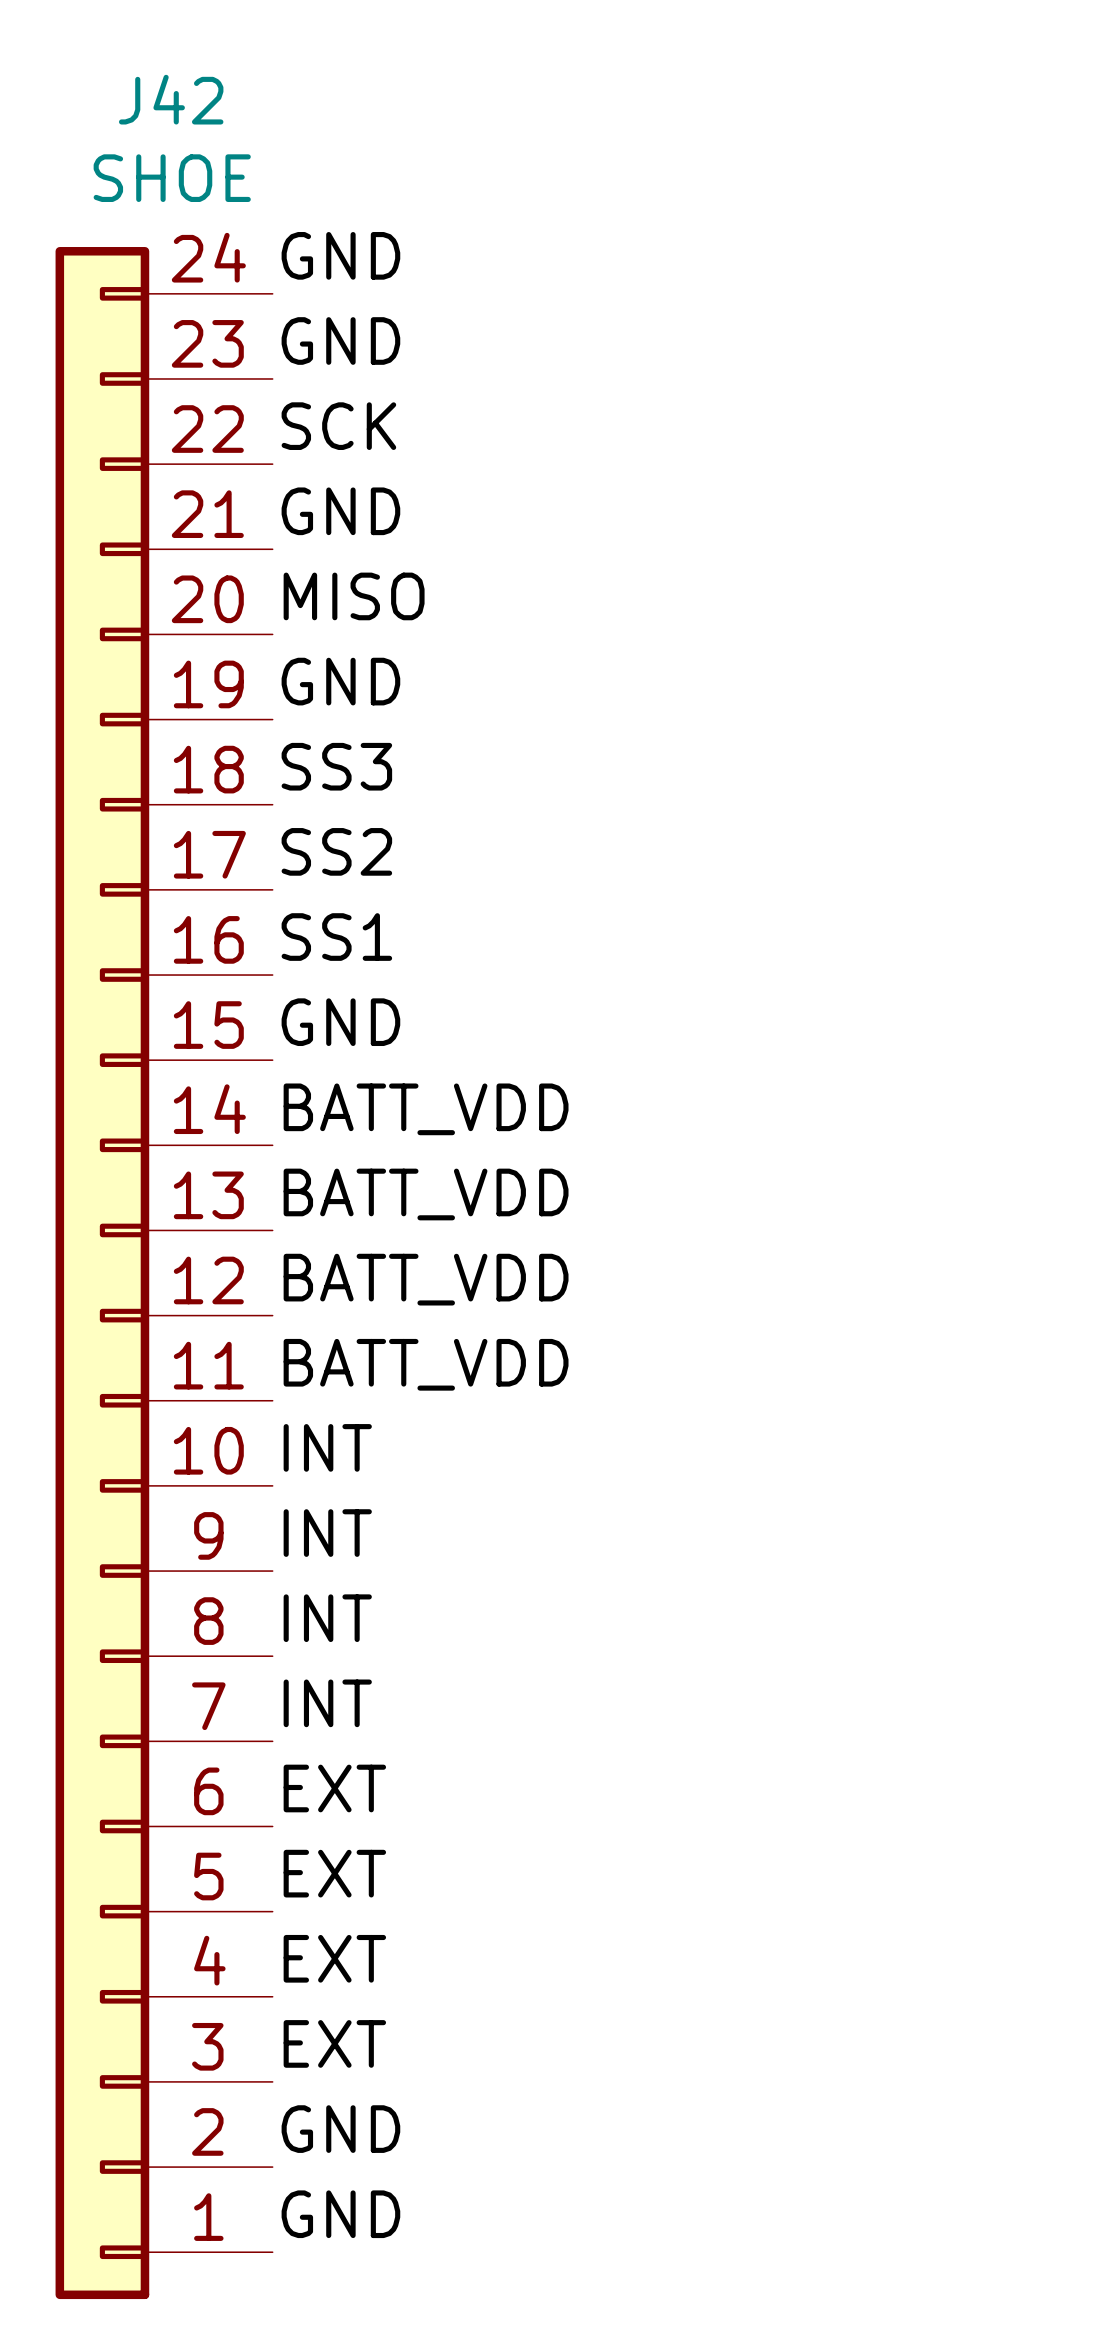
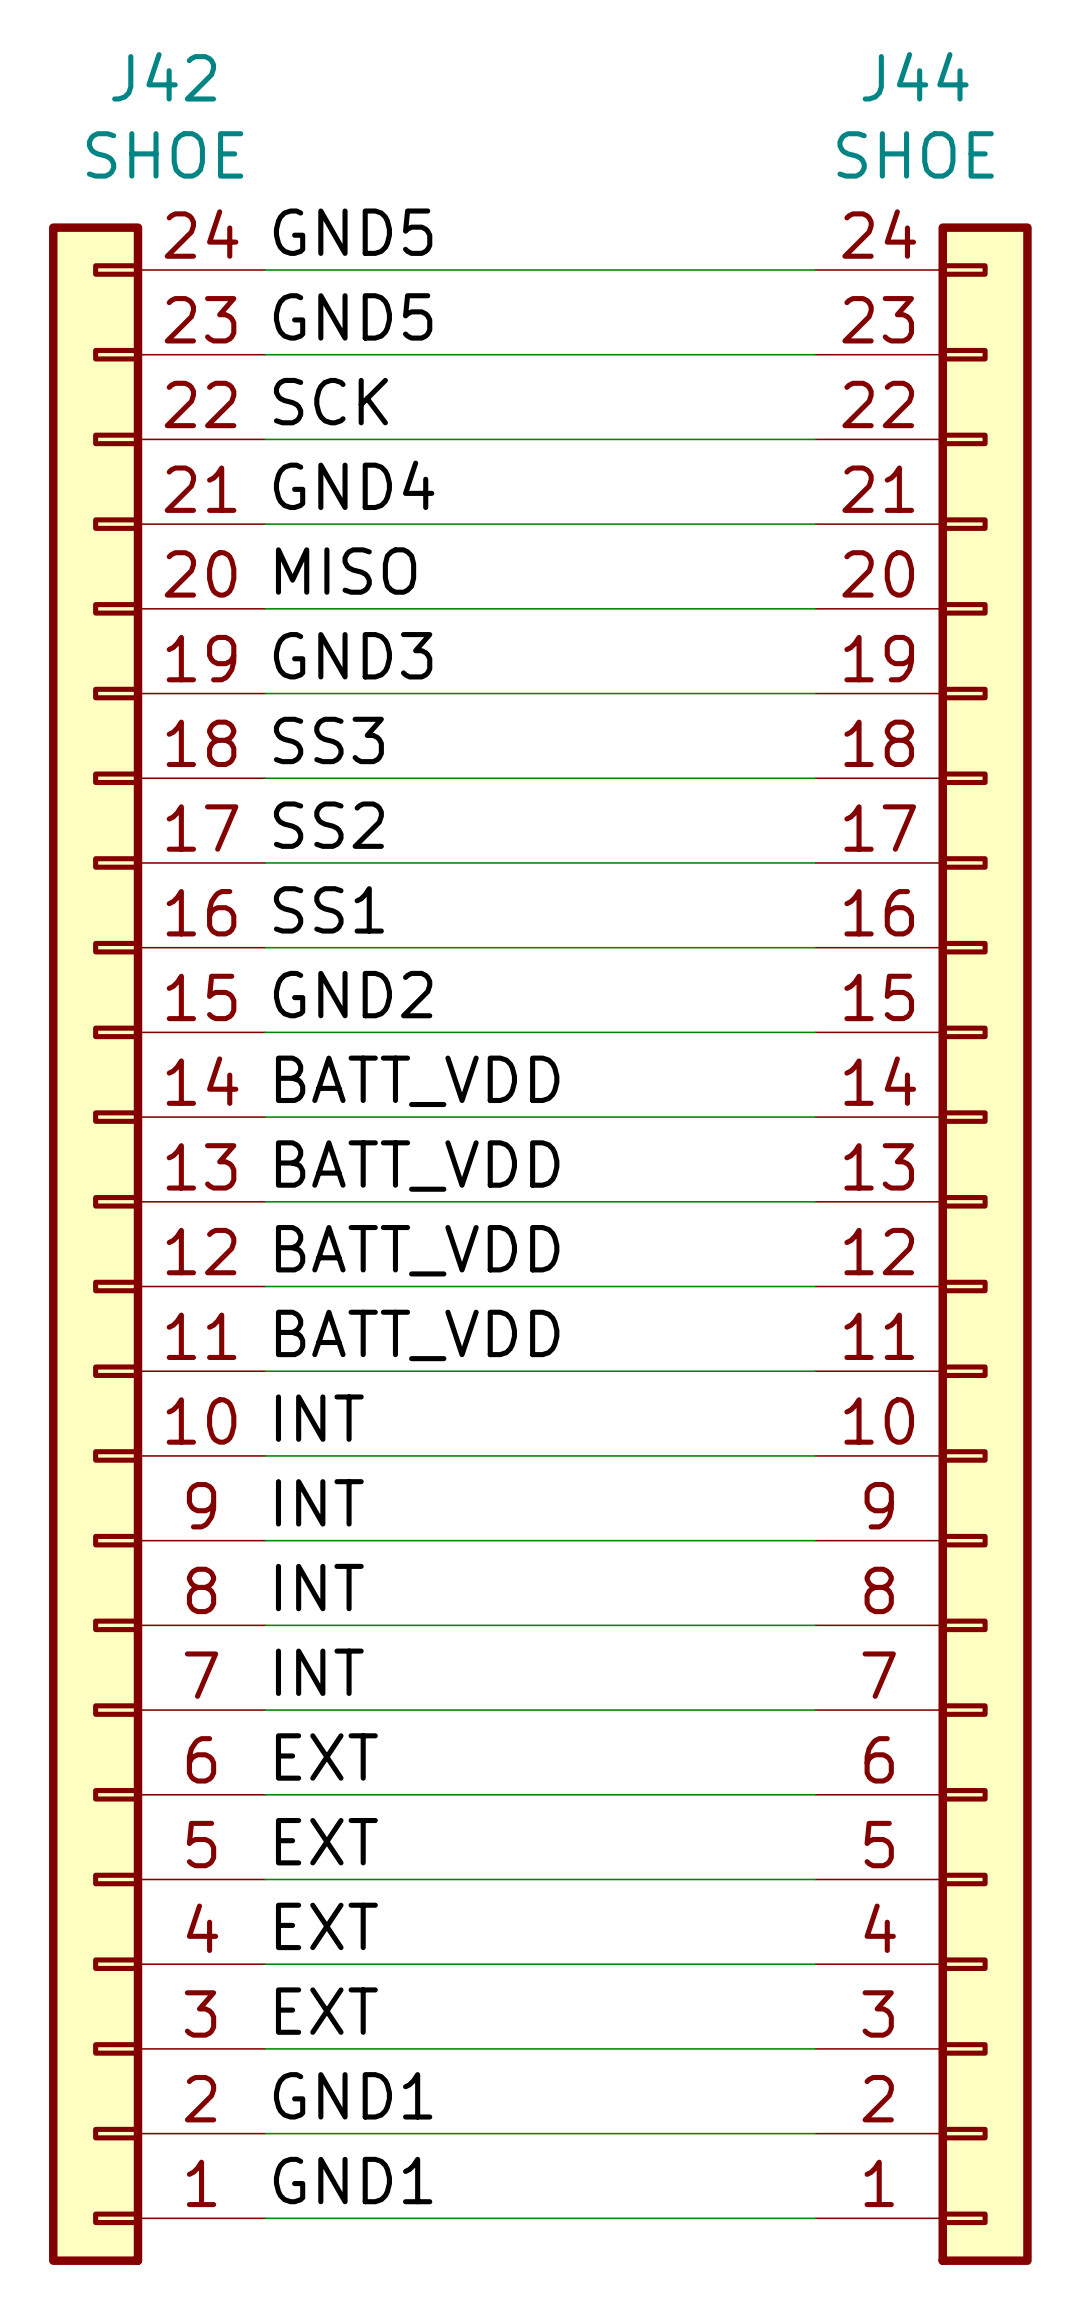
label: GND (340, 255) -> GND5 (353, 232)
wire: none -> (265, 269) (815, 269)
label: GND (340, 341) -> GND5 (353, 316)
wire: none -> (265, 354) (815, 354)
wire: none -> (265, 439) (815, 439)
label: GND (340, 511) -> GND4 (354, 485)
wire: none -> (265, 524) (815, 524)
wire: none -> (265, 608) (815, 608)
label: GND (340, 681) -> GND3 (353, 655)
wire: none -> (265, 693) (815, 693)
wire: none -> (265, 778) (815, 778)
wire: none -> (265, 862) (815, 862)
wire: none -> (265, 947) (815, 947)
label: GND (340, 1022) -> GND2 (353, 994)
wire: none -> (265, 1032) (815, 1032)
wire: none -> (265, 1117) (815, 1117)
wire: none -> (265, 1201) (815, 1201)
J44: none -> SHOE (923, 1244)
wire: none -> (265, 1286) (815, 1286)
wire: none -> (265, 1371) (815, 1371)
wire: none -> (265, 1455) (815, 1455)
wire: none -> (265, 1540) (815, 1540)
wire: none -> (265, 1625) (815, 1625)
wire: none -> (265, 1710) (815, 1710)
wire: none -> (265, 1794) (815, 1794)
wire: none -> (265, 1879) (815, 1879)
wire: none -> (265, 1964) (815, 1964)
wire: none -> (265, 2048) (815, 2048)
label: GND (340, 2129) -> GND1 (353, 2095)
wire: none -> (265, 2133) (815, 2133)
label: GND (340, 2214) -> GND1 (353, 2180)
wire: none -> (265, 2218) (815, 2218)

